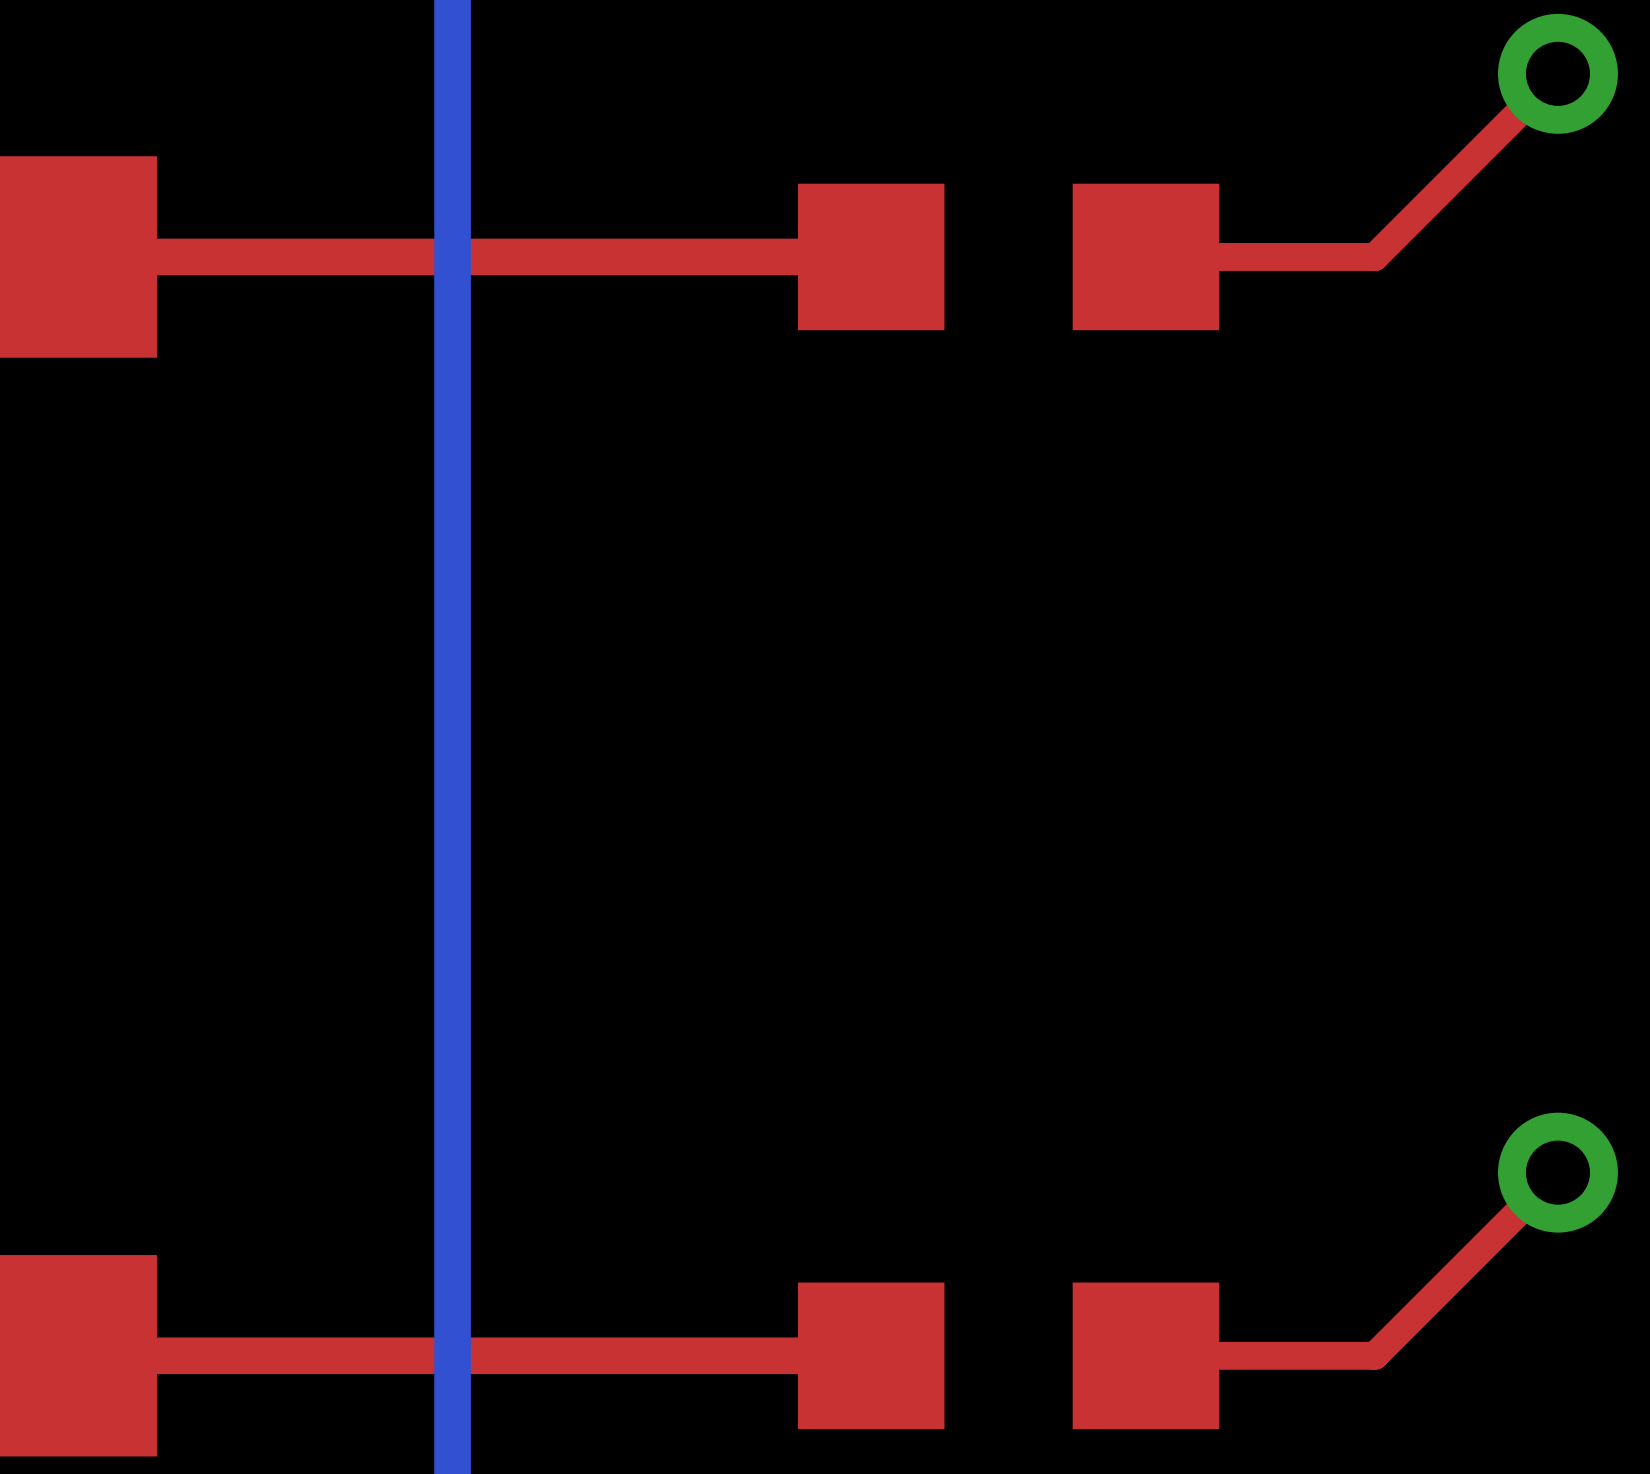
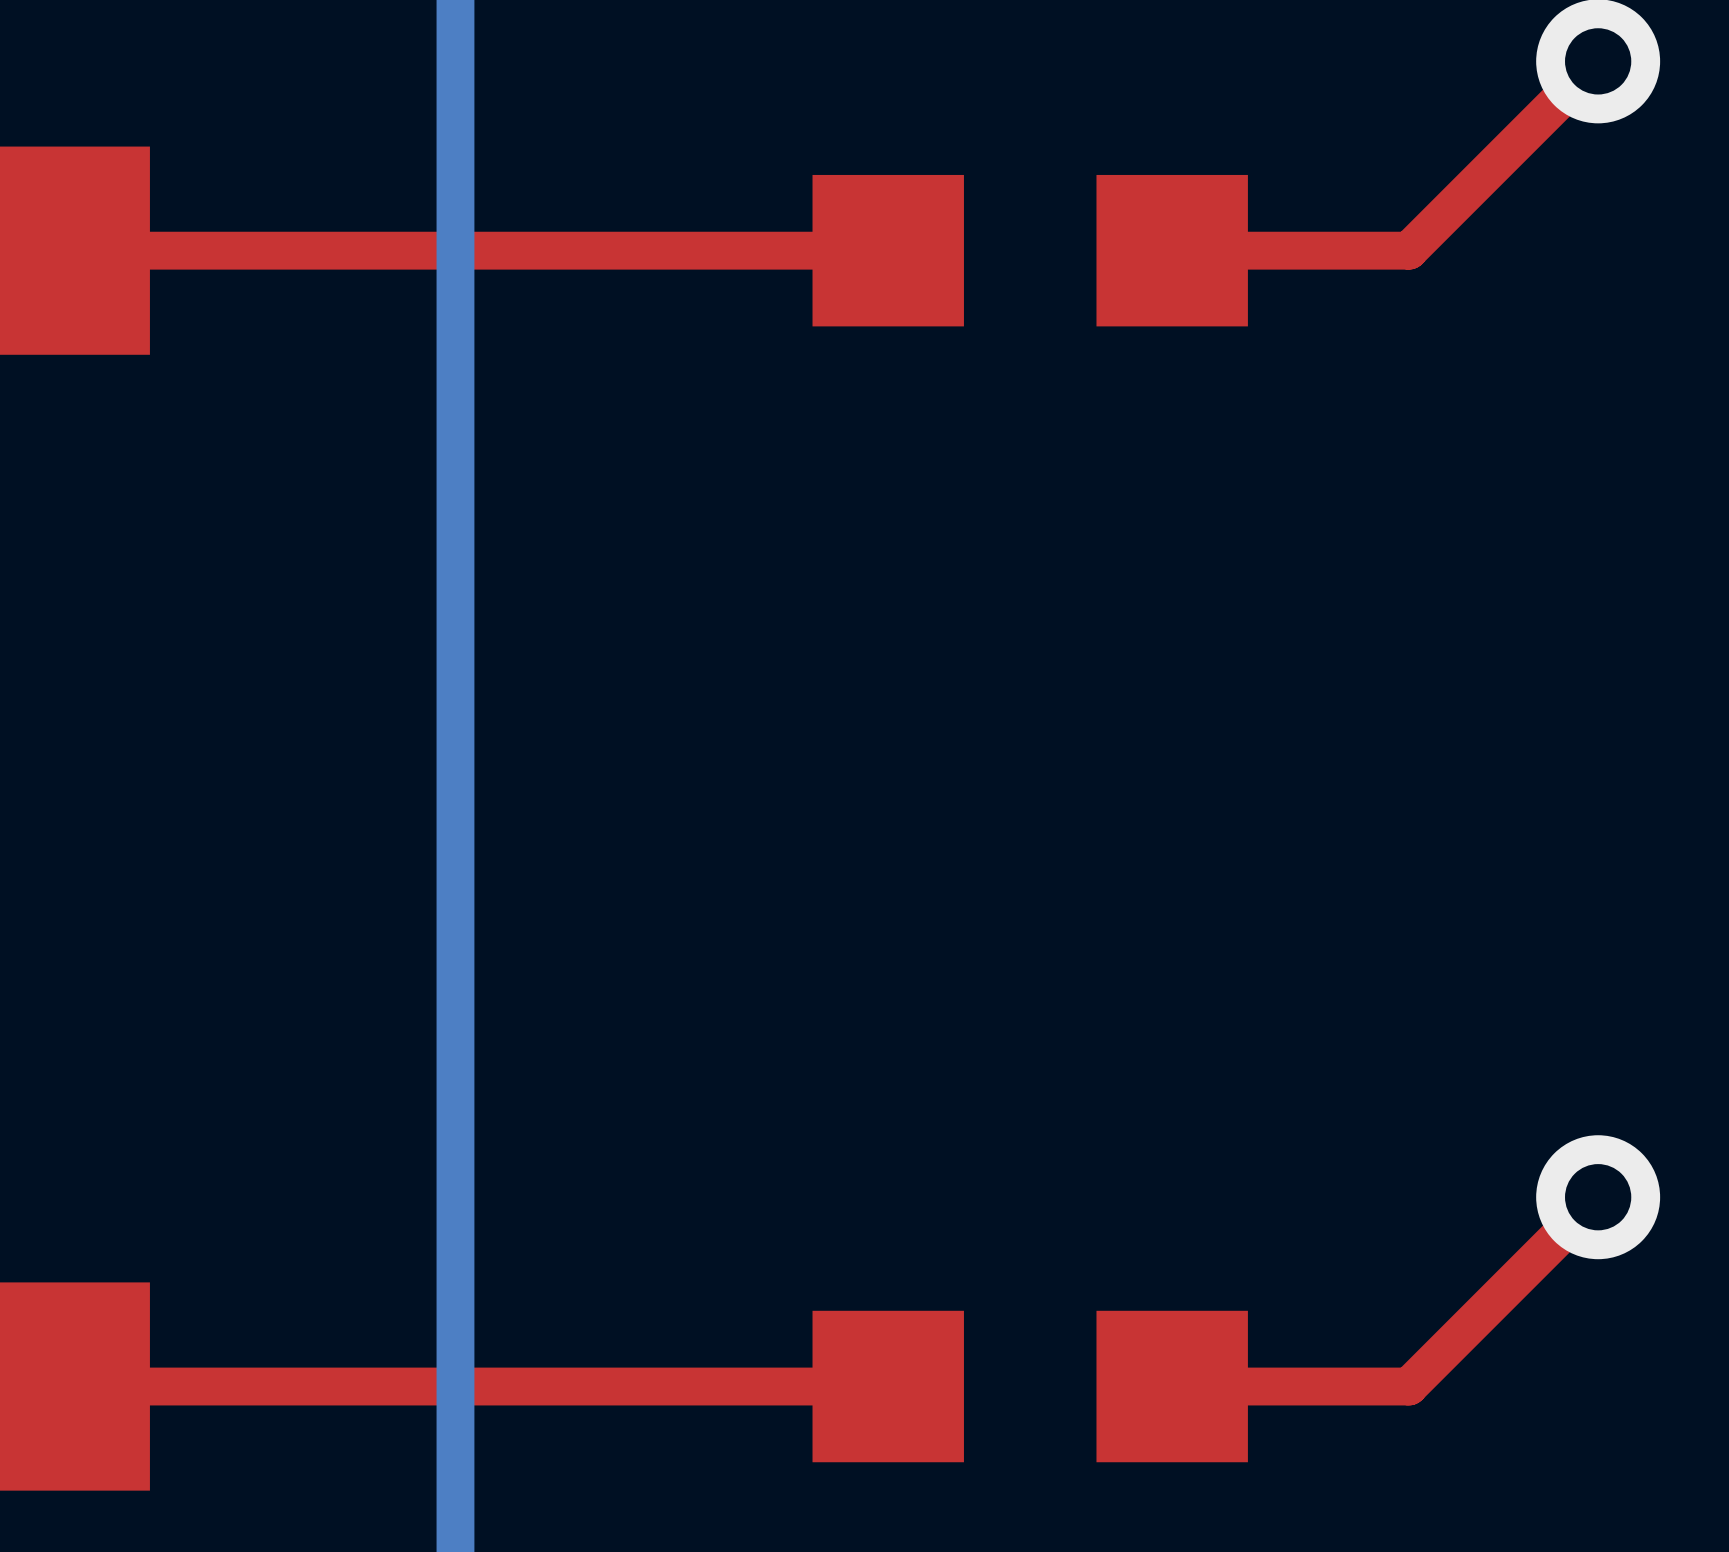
top track width: thin (1557, 73) (1374, 256) (1145, 256) -> thick (1598, 61) (1408, 250) (1172, 250)
top track width: thin (1557, 1172) (1374, 1355) (1145, 1355) -> thick (1598, 1197) (1408, 1386) (1172, 1386)

